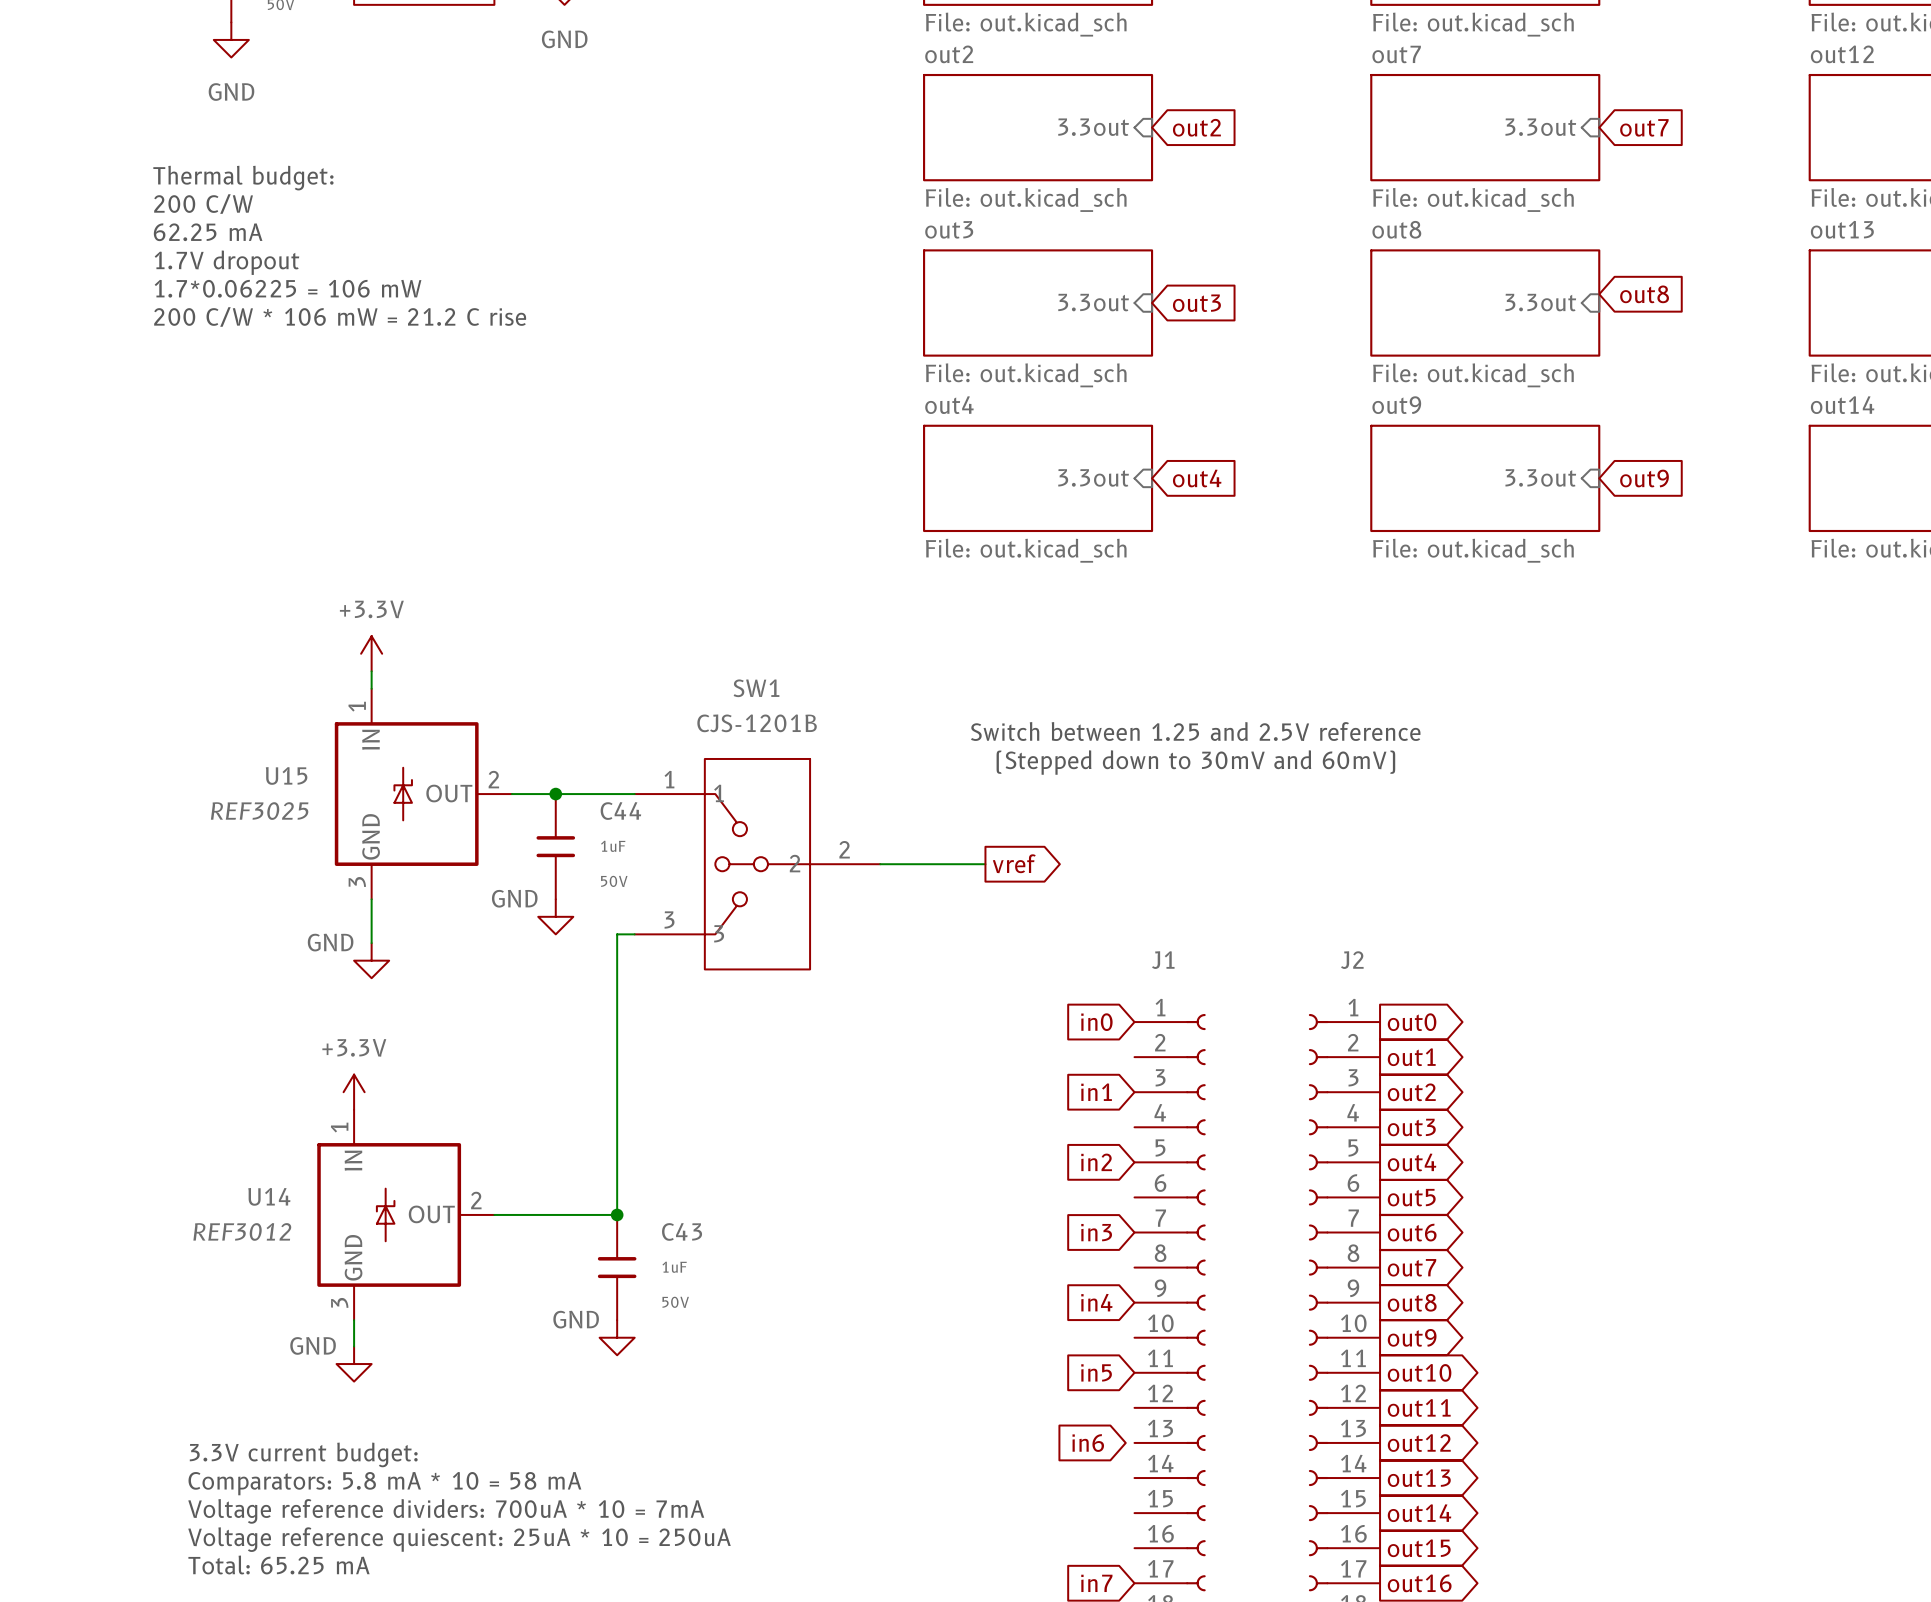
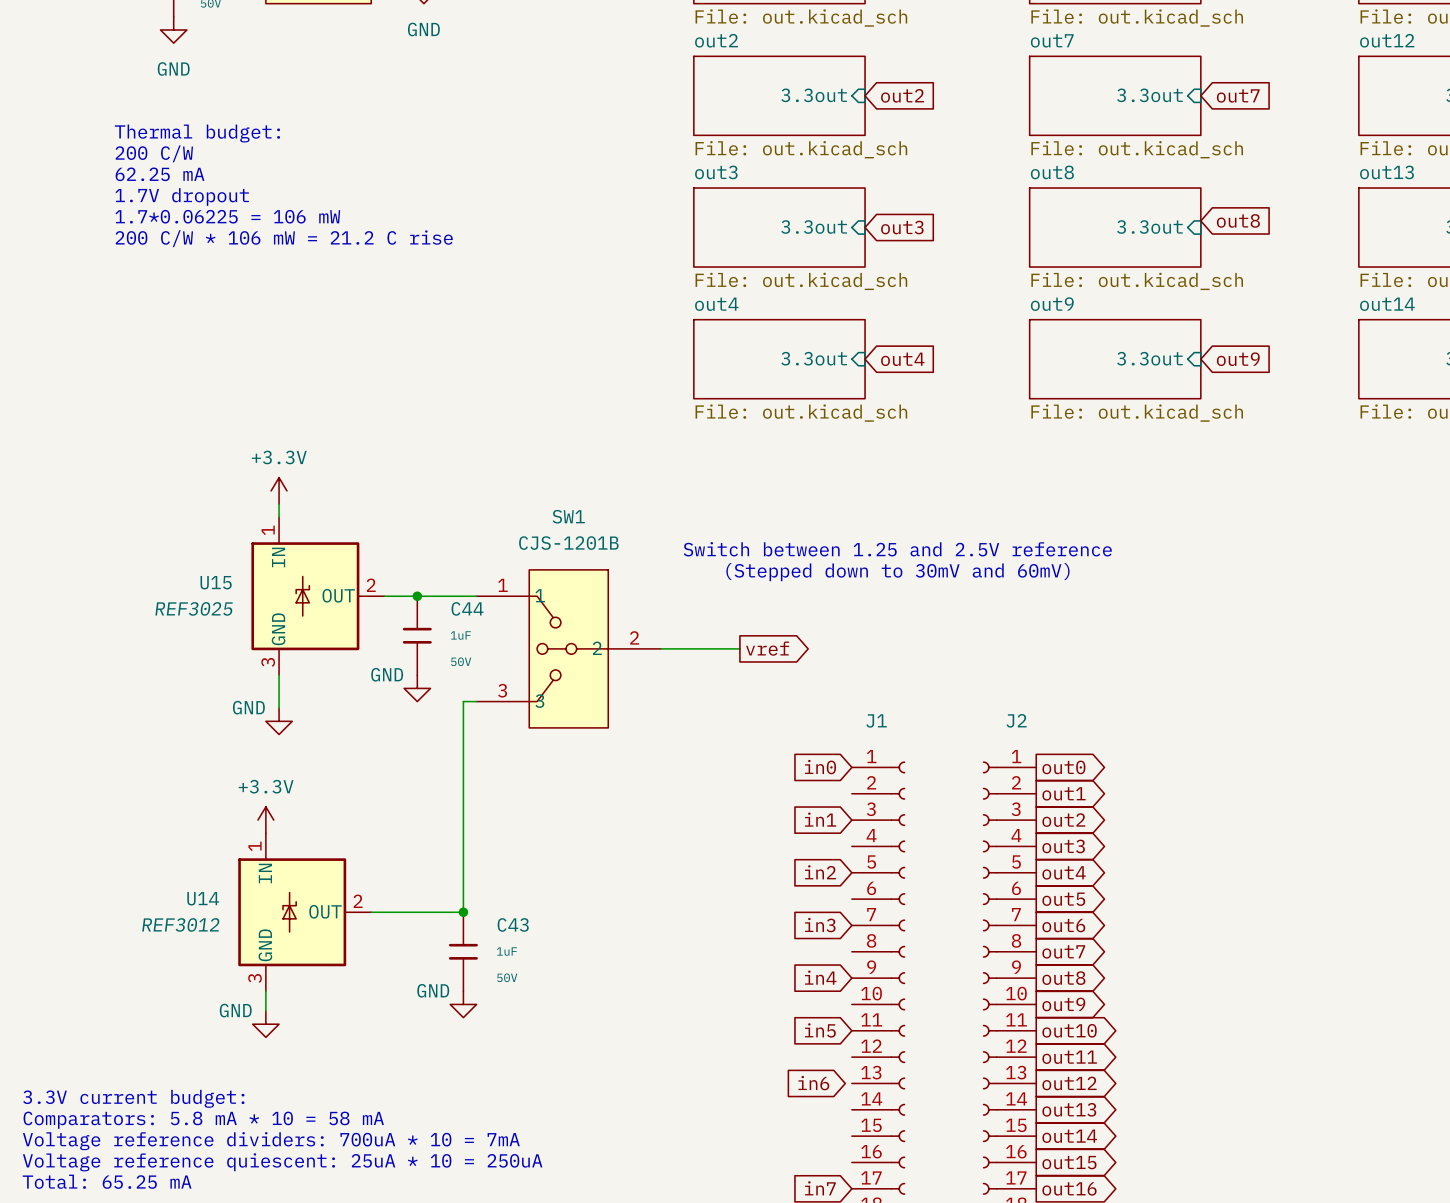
text position: 3.3V current budget: (303, 1454) -> 3.3V current budget: (133, 1098)
text position: Comparators: 5.8 mA * 10 = 58 mA (384, 1483) -> Comparators: 5.8 mA * 10 = 58 mA (203, 1120)
text position: Voltage reference dividers: 700uA * 10 = 7mA (446, 1511) -> Voltage reference dividers: 700uA * 10 = 7mA (271, 1141)
text position: Voltage reference quiescent: 25uA * 10 = 250uA (459, 1539) -> Voltage reference quiescent: 25uA * 10 = 250uA (282, 1162)
text position: Total: 65.25 mA (279, 1564) -> Total: 65.25 mA (107, 1181)

